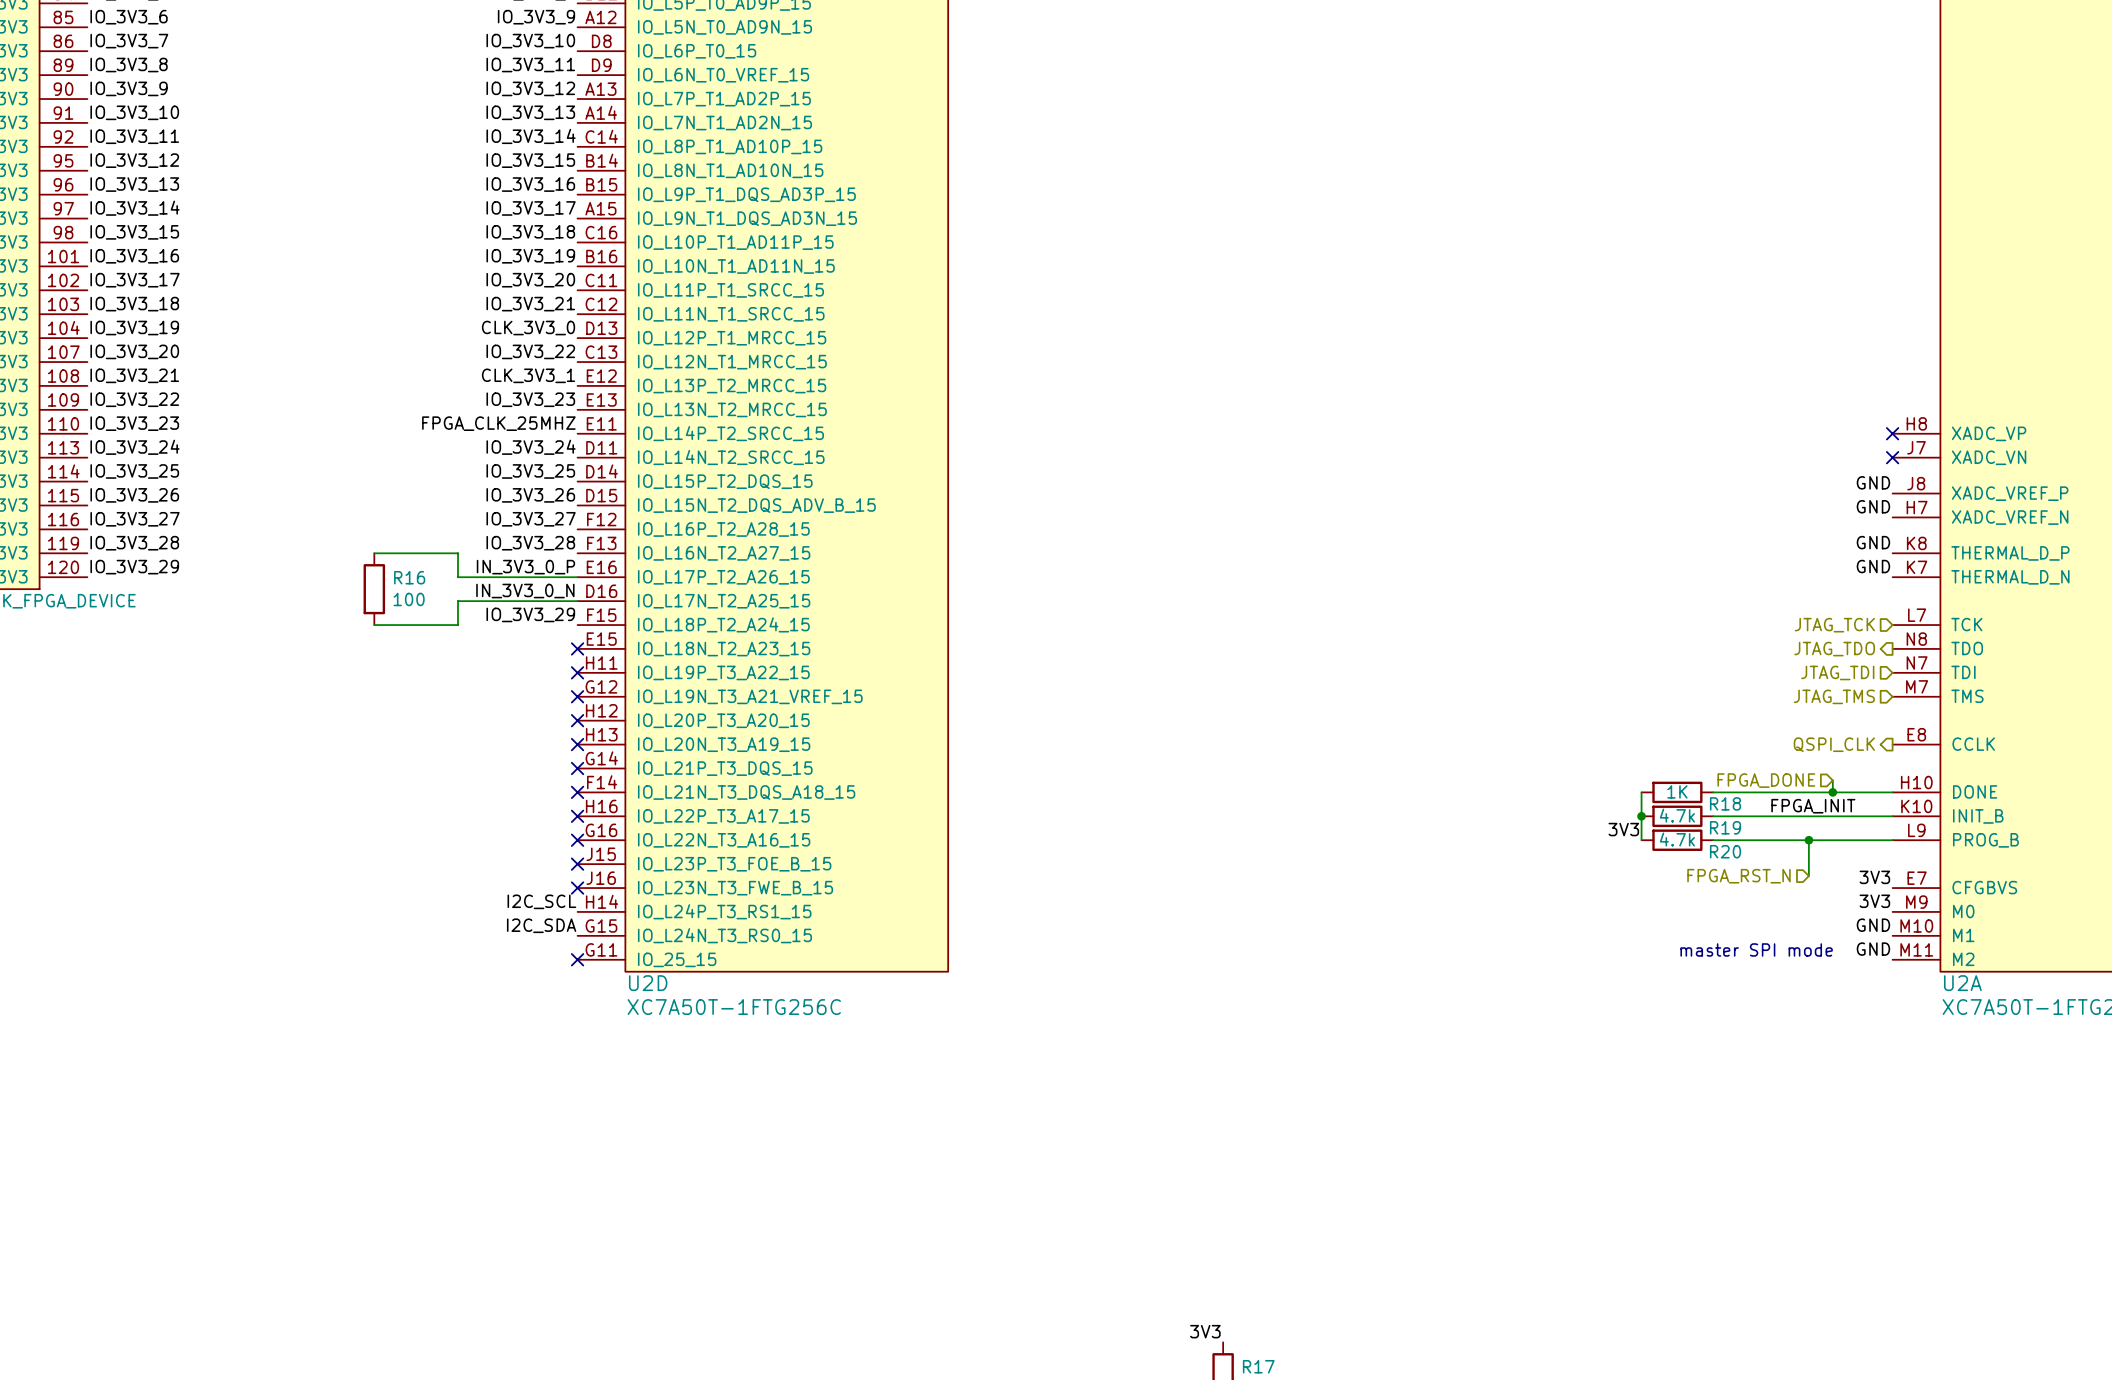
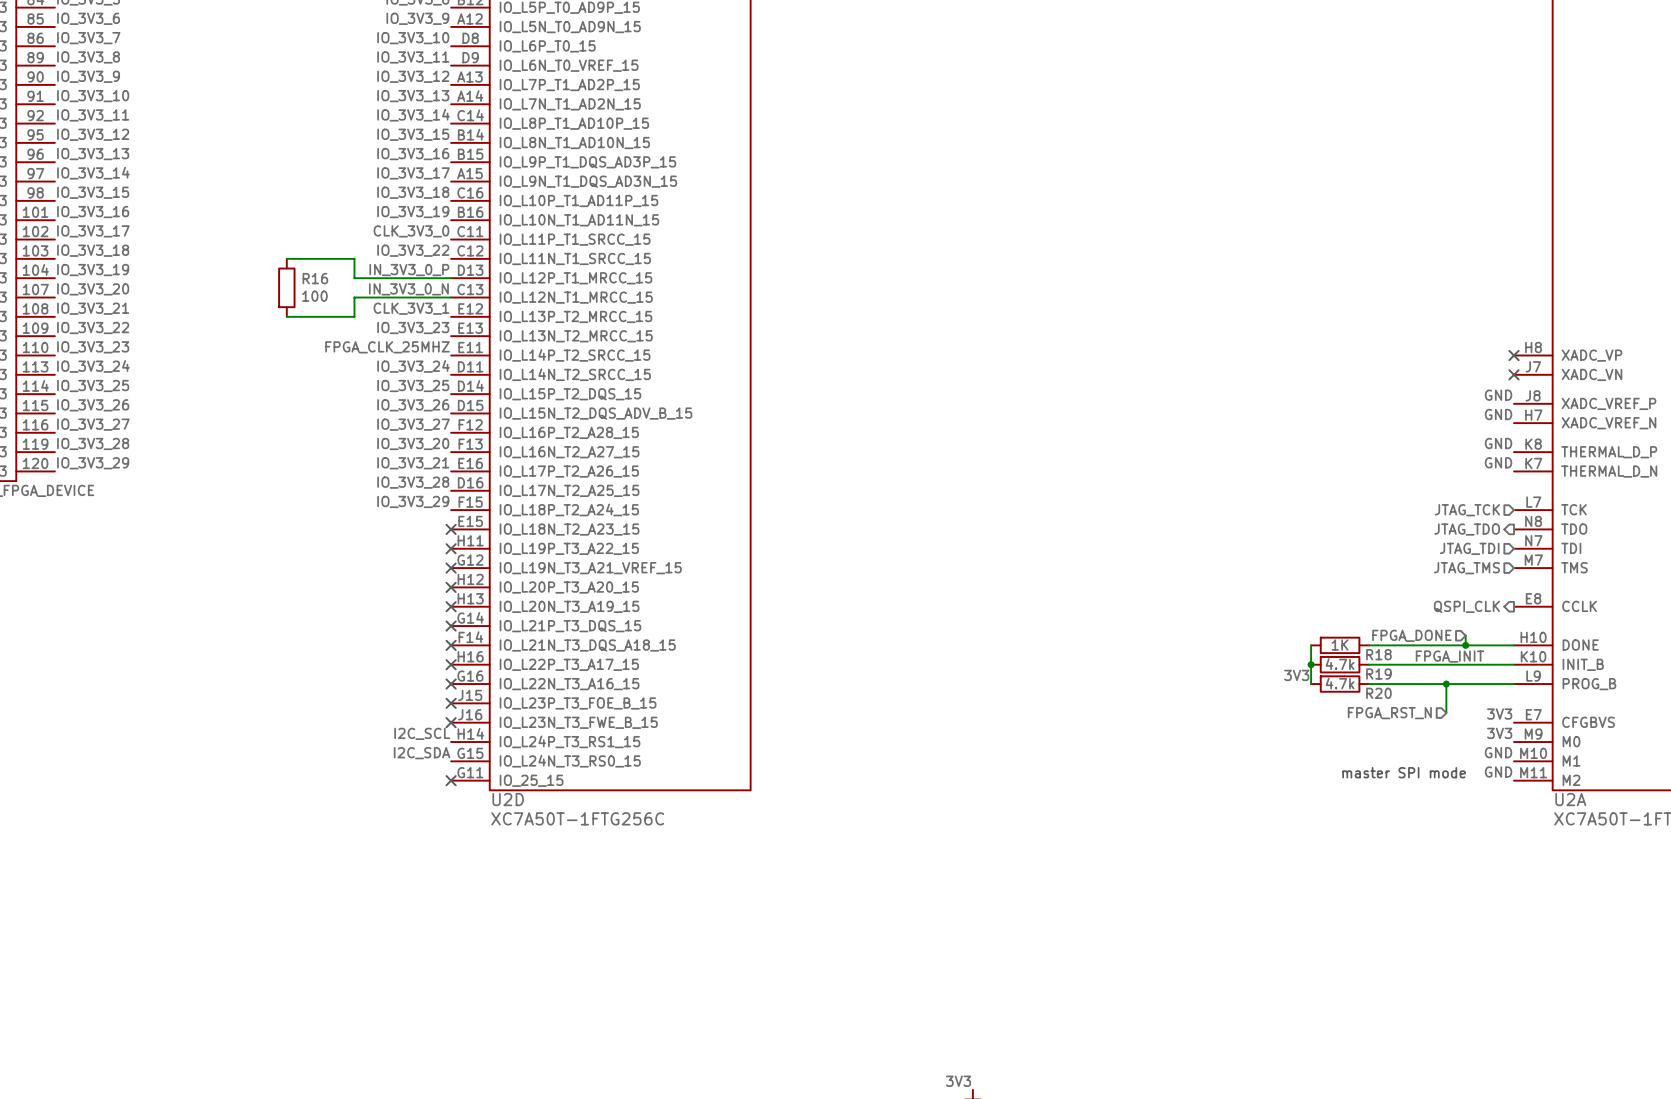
label: IO_3V3_20 (530, 280) -> CLK_3V3_0 (411, 231)
label: IO_3V3_21 (530, 304) -> IO_3V3_22 (413, 250)
wire: none -> (286, 258) (354, 258) (354, 278) (451, 278)
label: CLK_3V3_0 (528, 328) -> IN_3V3_0_P (409, 270)
label: IO_3V3_22 (530, 351) -> IN_3V3_0_N (408, 289)
wire: none -> (451, 297) (354, 297) (354, 316) (286, 316)
label: IO_3V3_28 (530, 543) -> IO_3V3_20 (413, 443)
wire: (374, 553) (458, 553) (458, 577) (577, 577) -> none
label: IN_3V3_0_P (525, 567) -> IO_3V3_21 (413, 463)
R16 position: (374, 589) -> (286, 287)
label: IN_3V3_0_N (525, 591) -> IO_3V3_28 (413, 482)
wire: (577, 601) (458, 601) (458, 625) (374, 625) -> none

